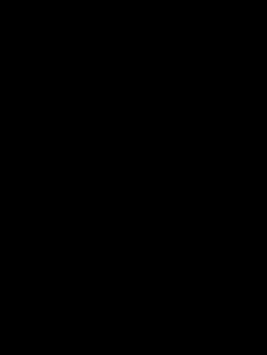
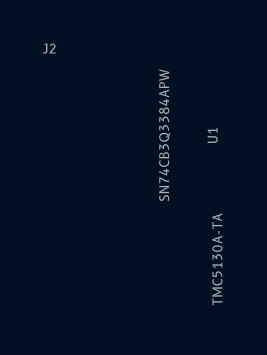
text: none -> J2 (49, 48)
text: none -> SN74CB3Q3384APW (164, 135)
text: none -> U1 (212, 135)
text: none -> TMC5130A-TA (217, 259)

